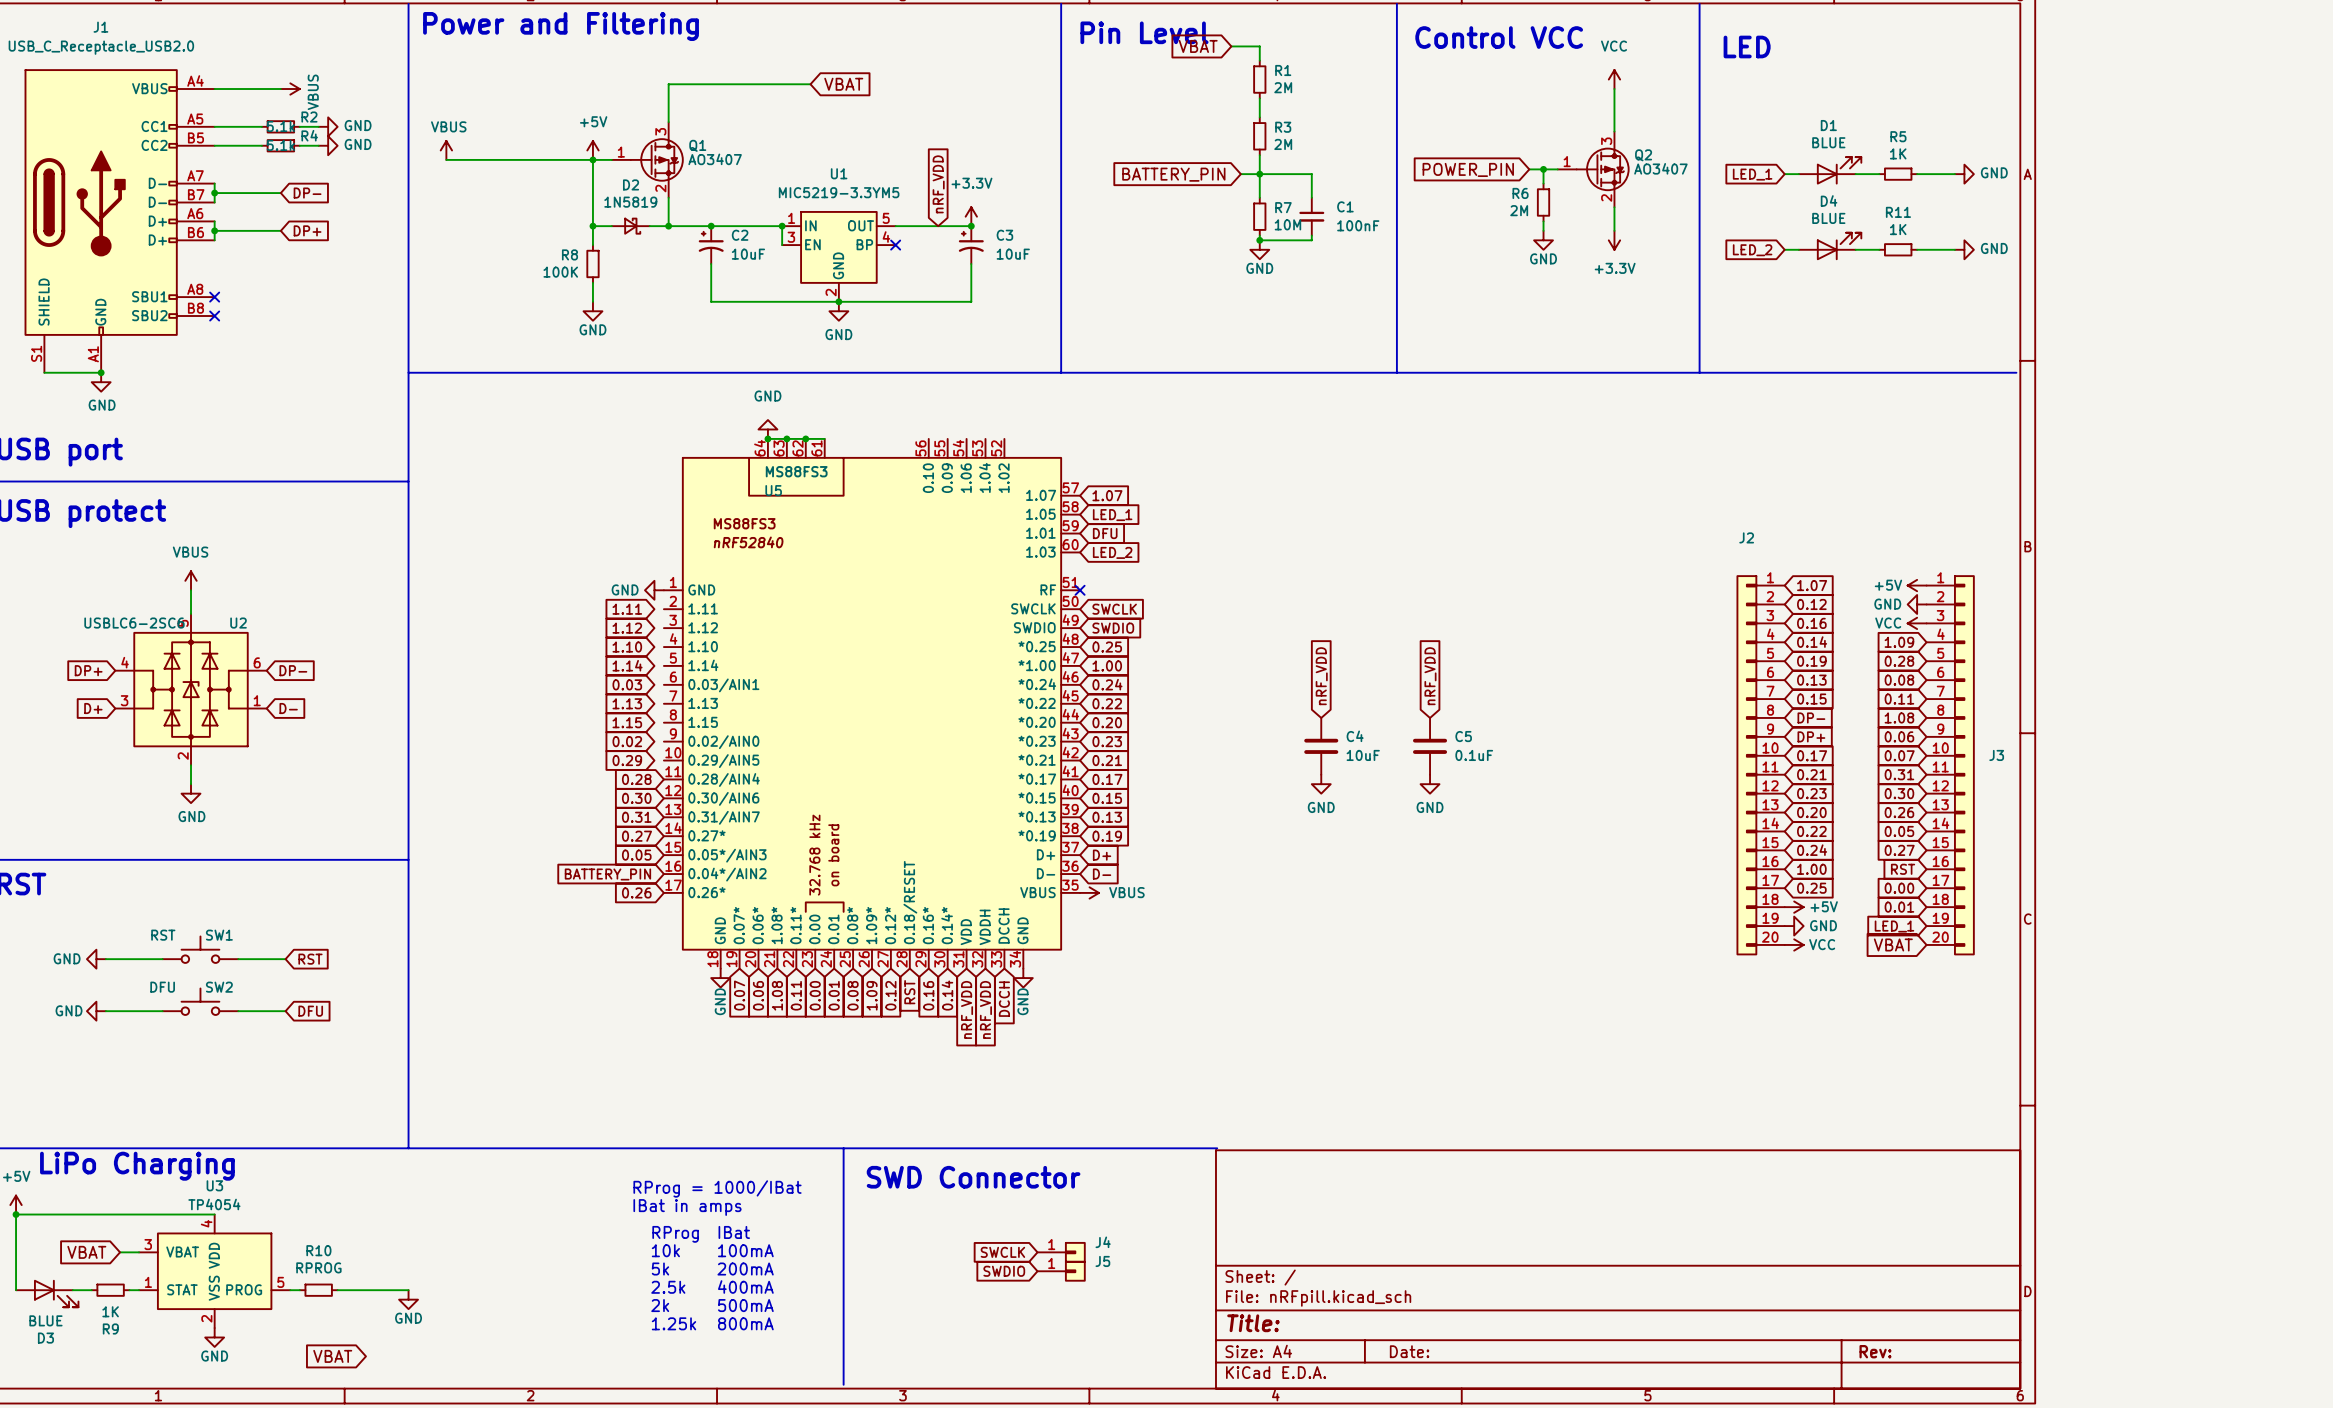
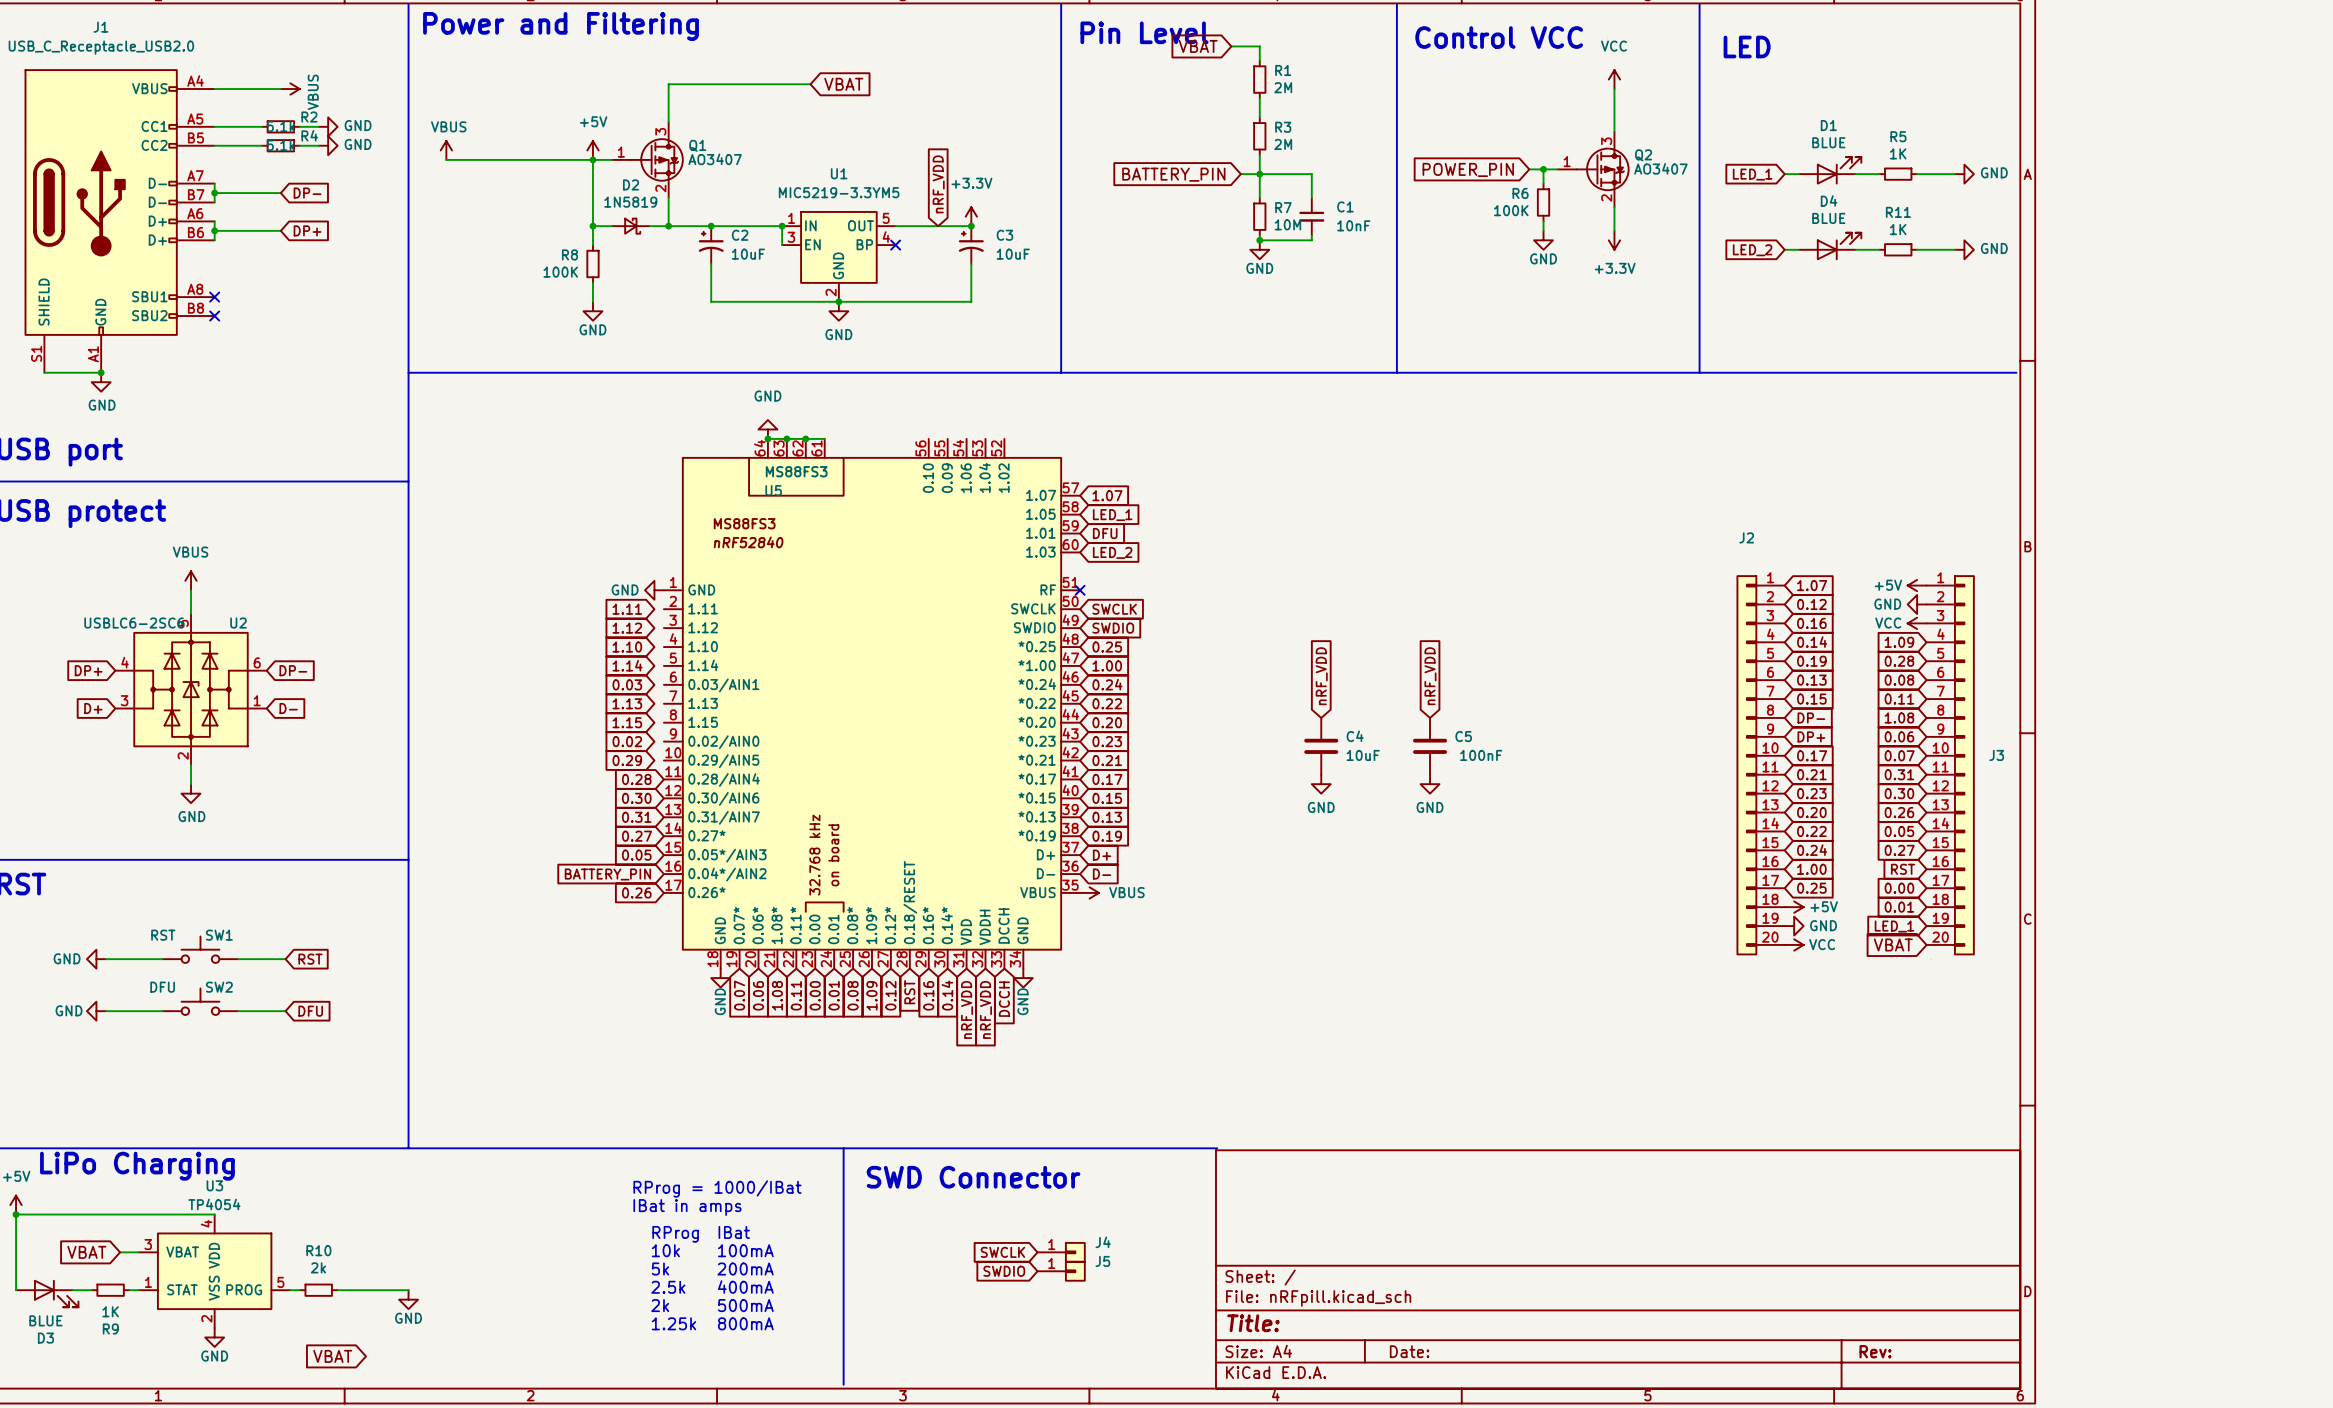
R6 value: 2M (1519, 210) -> 100K (1511, 210)
C1 value: 100nF (1358, 225) -> 10nF (1353, 225)
C5 value: 0.1uF (1474, 755) -> 100nF (1481, 755)
R10 value: RPROG (318, 1267) -> 2k (318, 1267)

